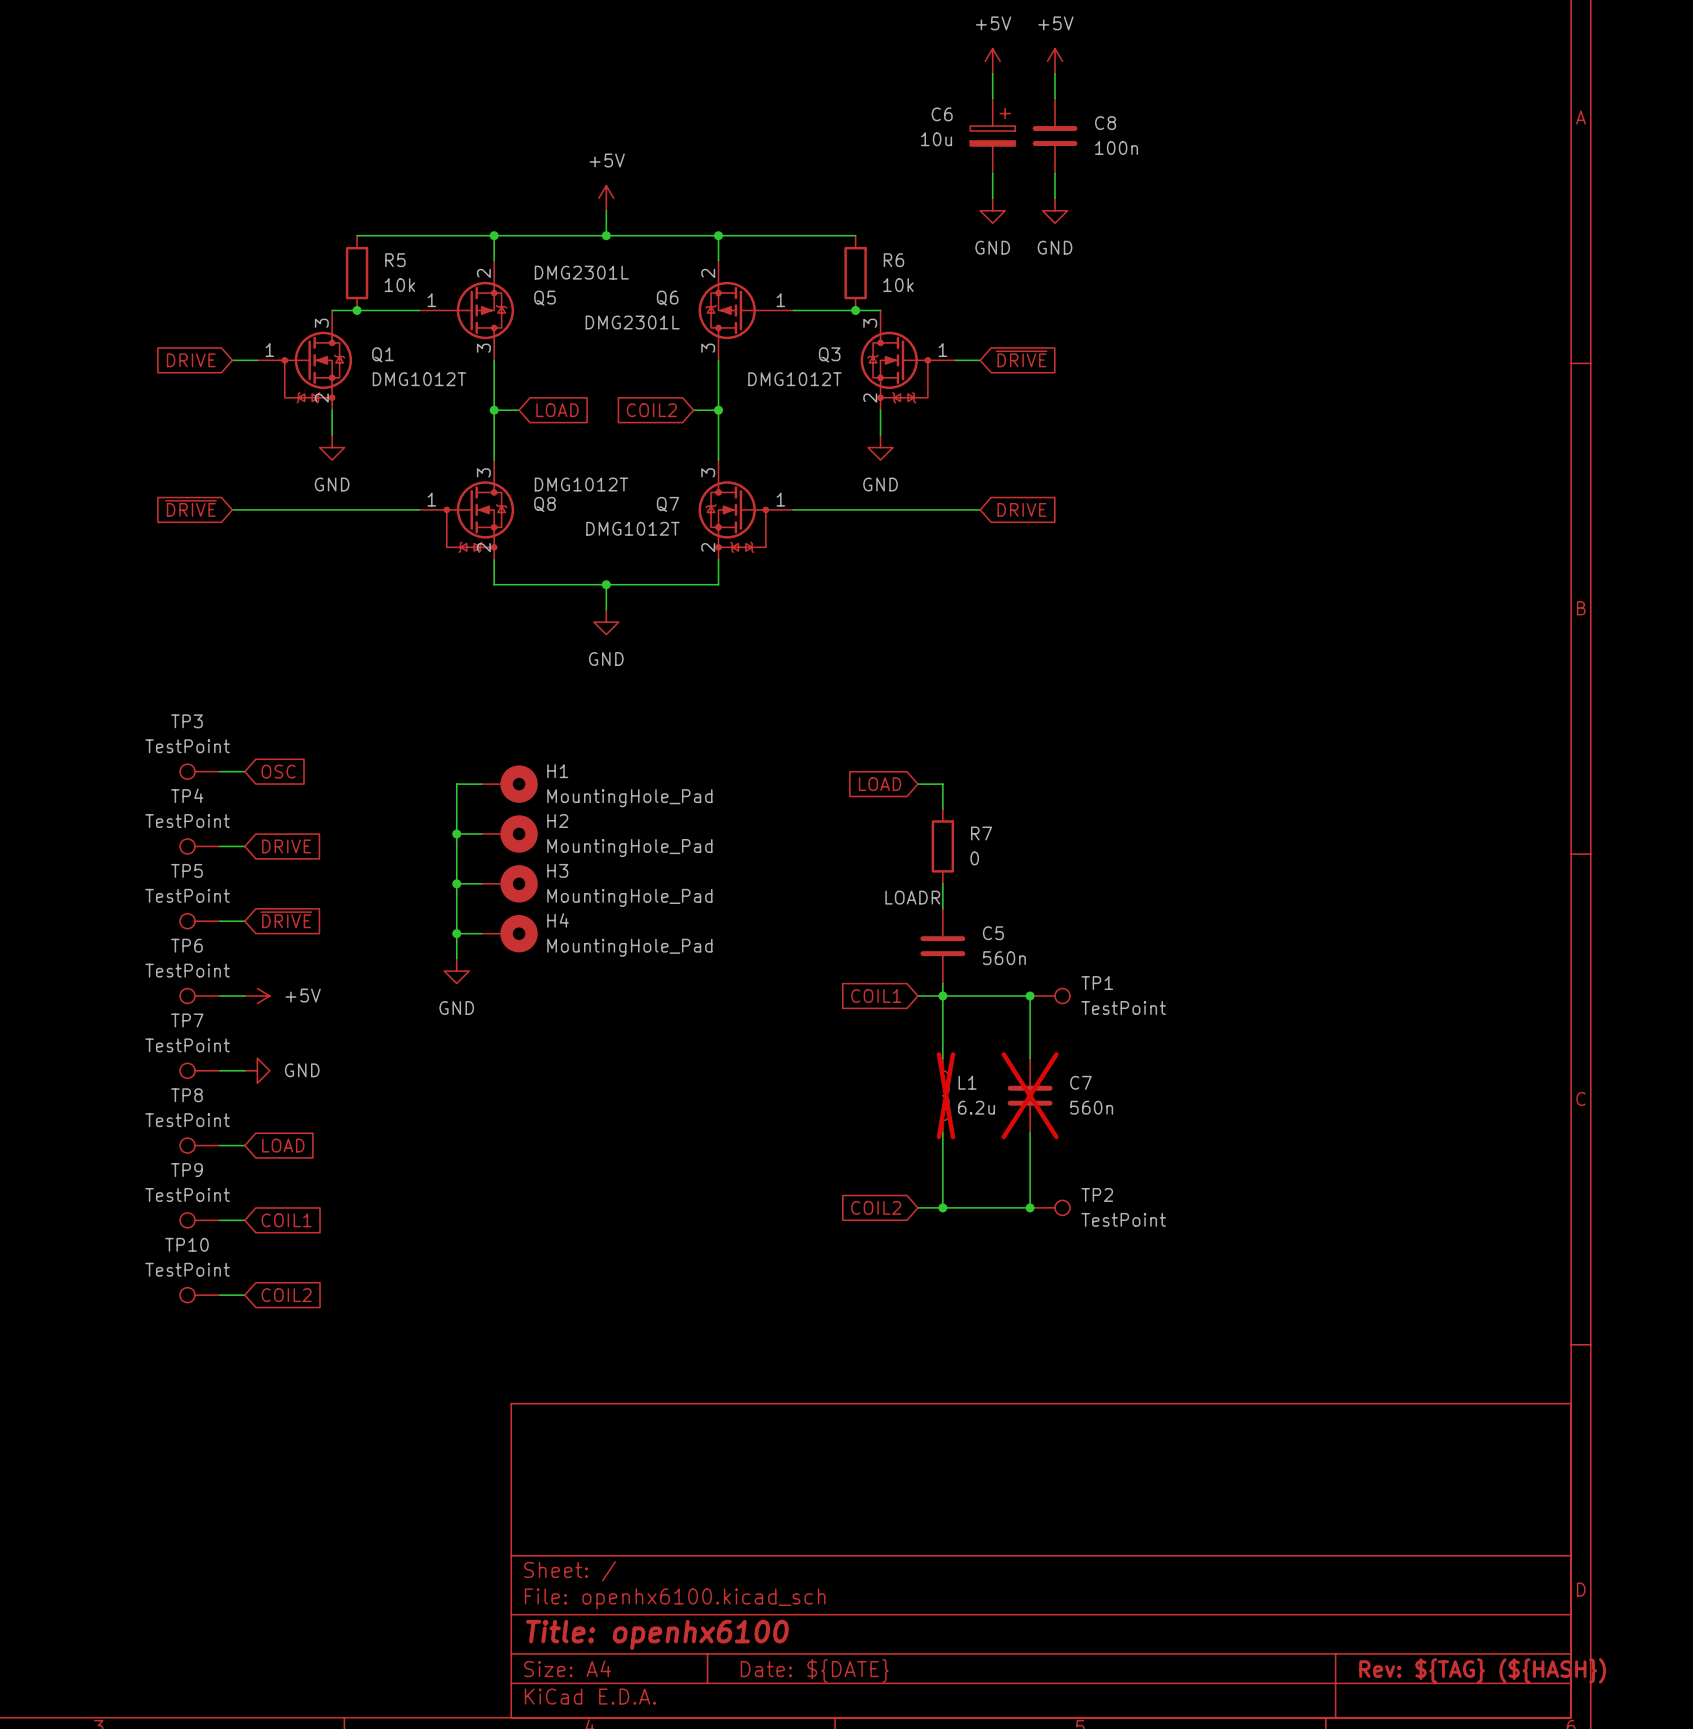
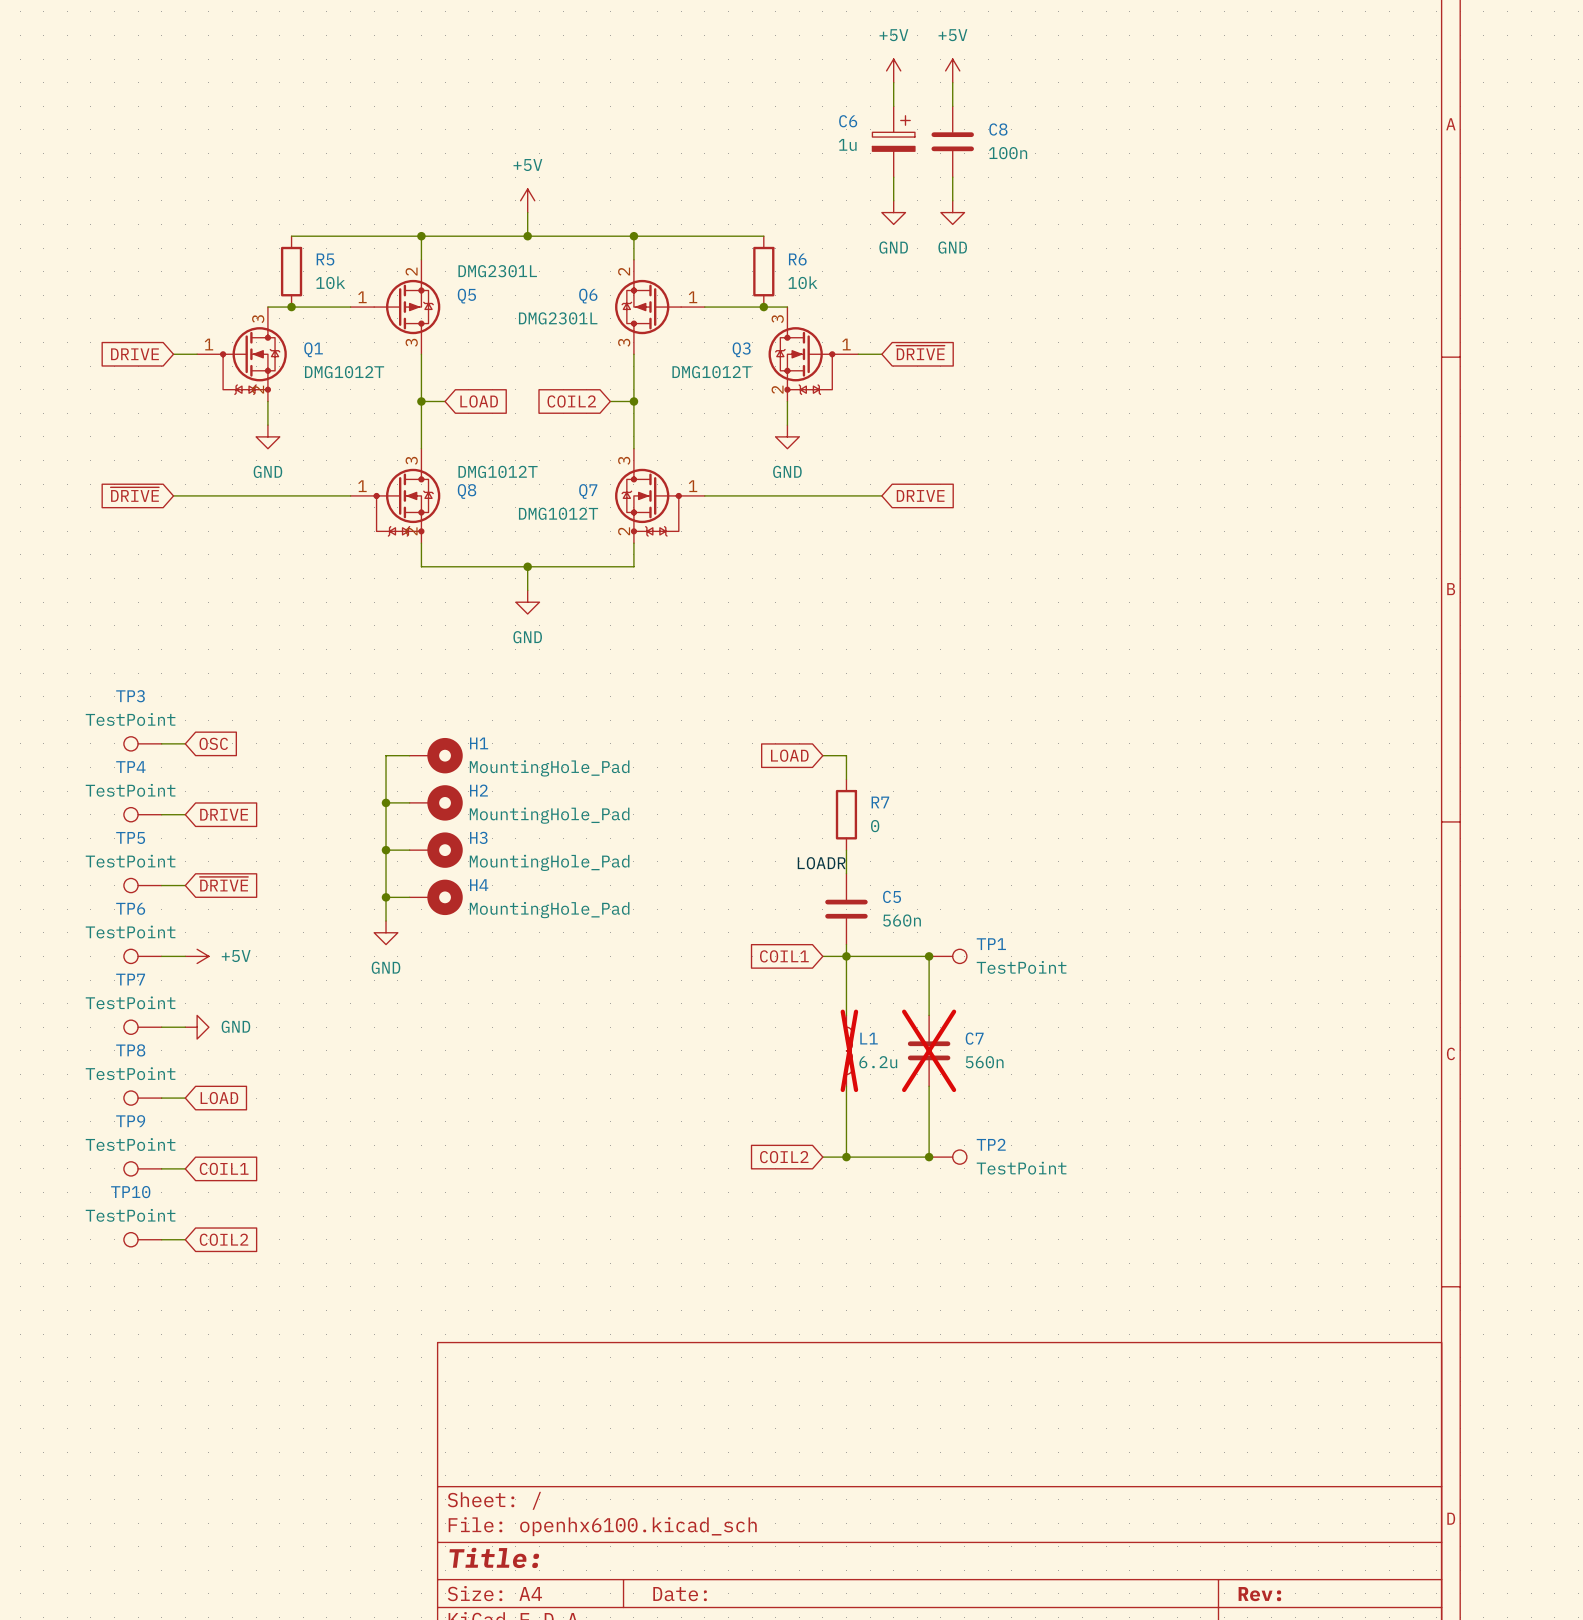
C6 value: 10u (936, 139) -> 1u (847, 144)
title block: Title: openhx6100 (657, 1634) -> Title: (494, 1557)
title block: Date: ${DATE} (814, 1670) -> Date: (680, 1594)
title block: Rev: ${TAG} (${HASH}) (1482, 1670) -> Rev: (1259, 1594)

